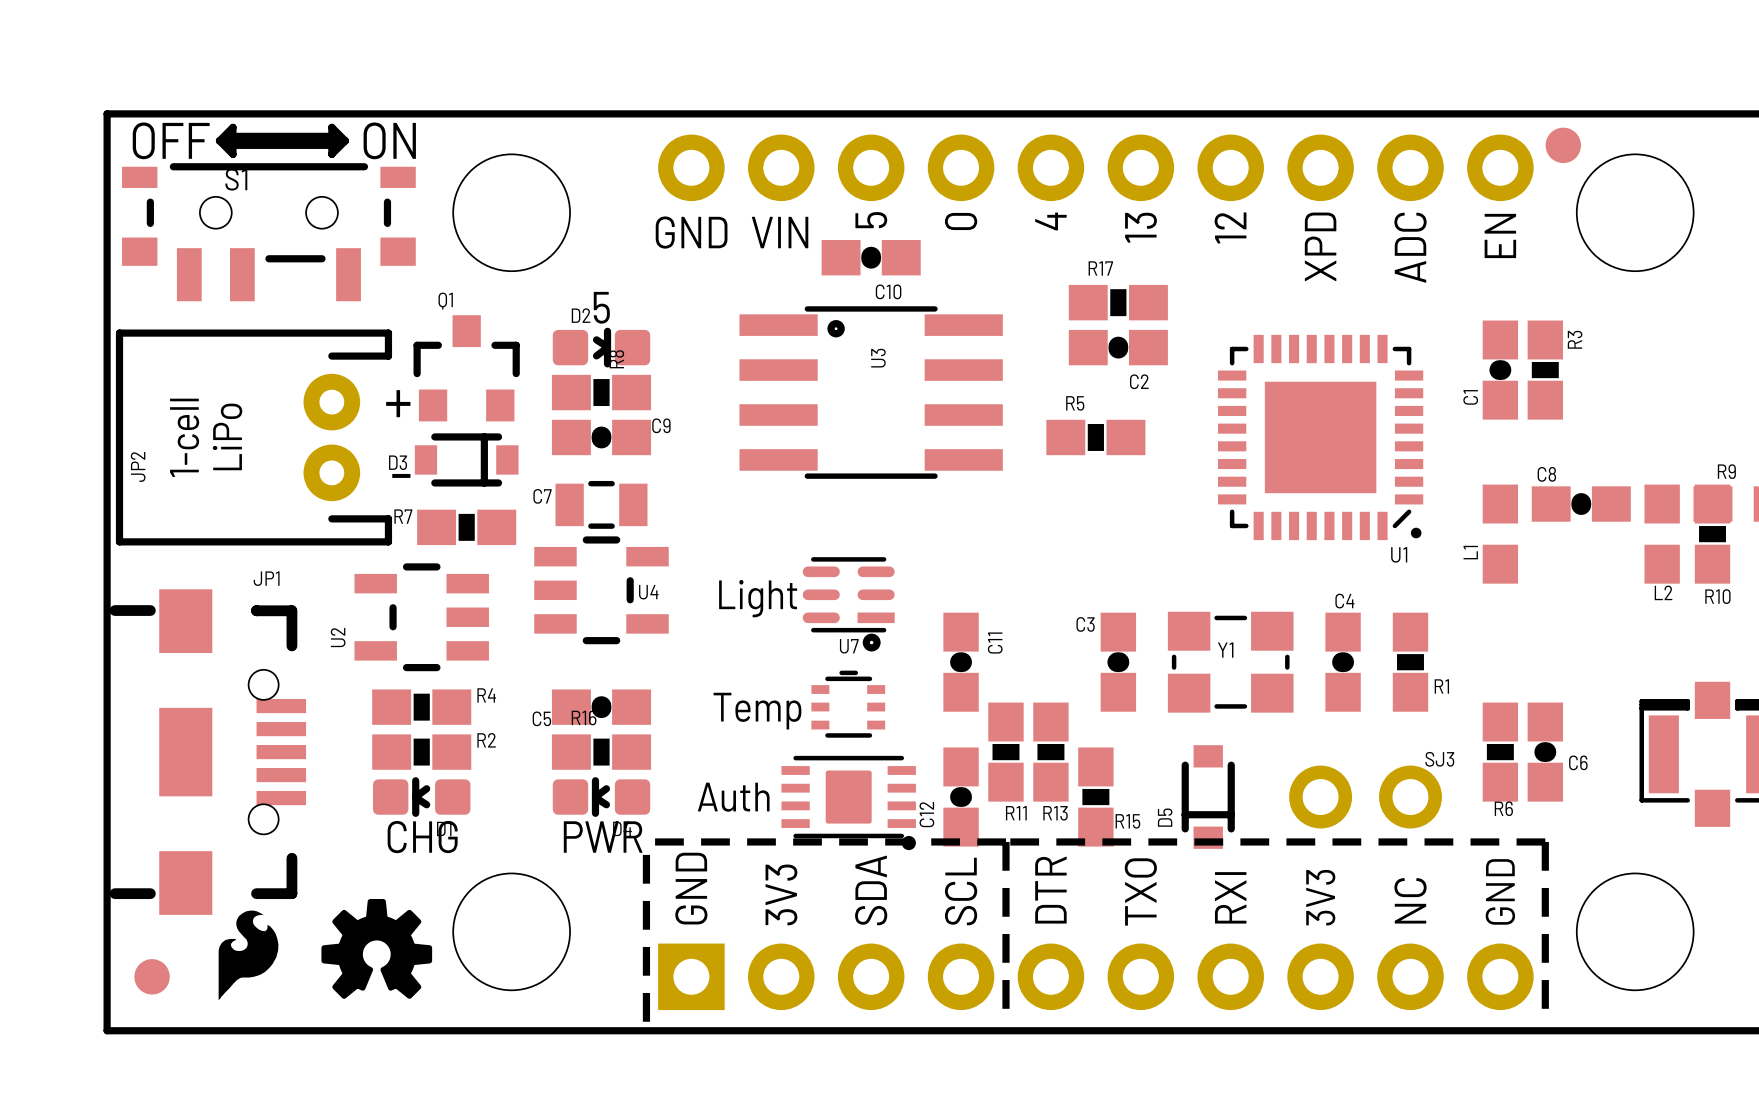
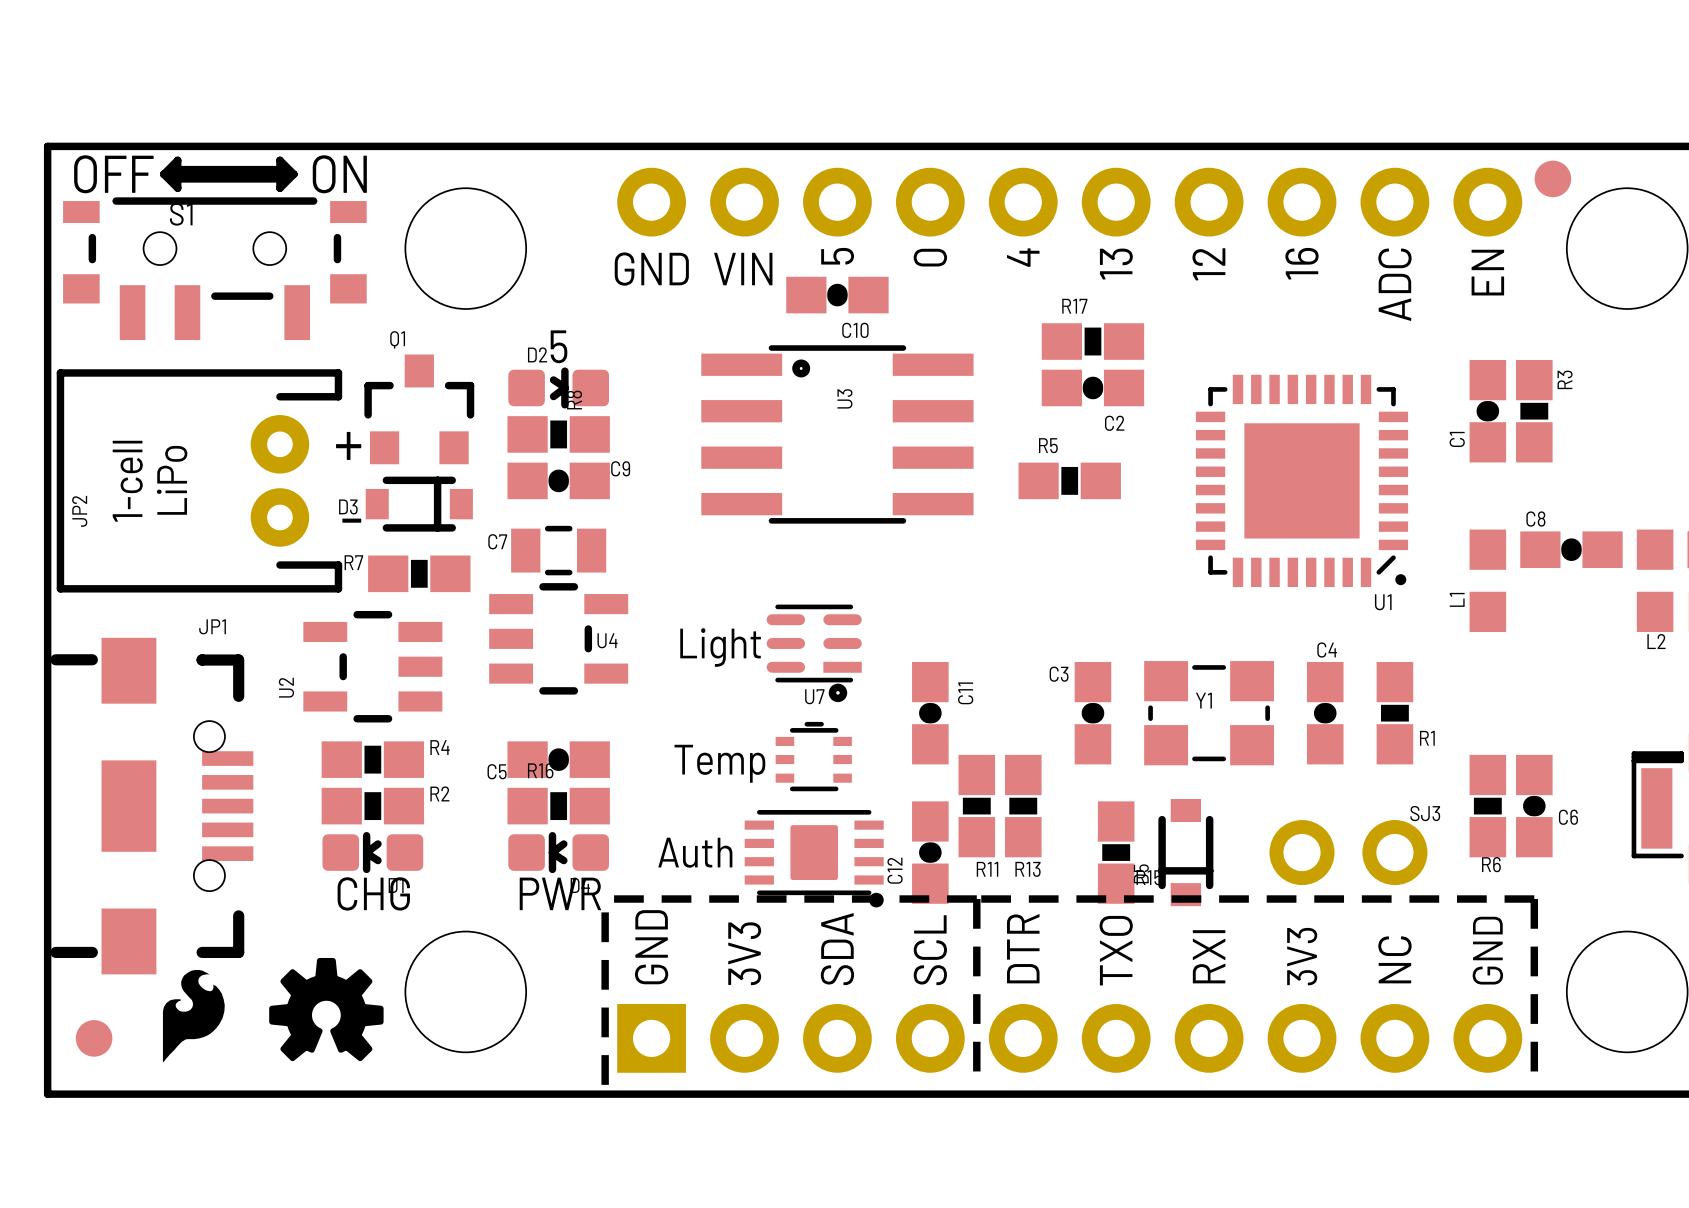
text: XPD (1320, 246) -> 16 (1301, 263)
R15 position: (1095, 797) -> (1116, 852)

